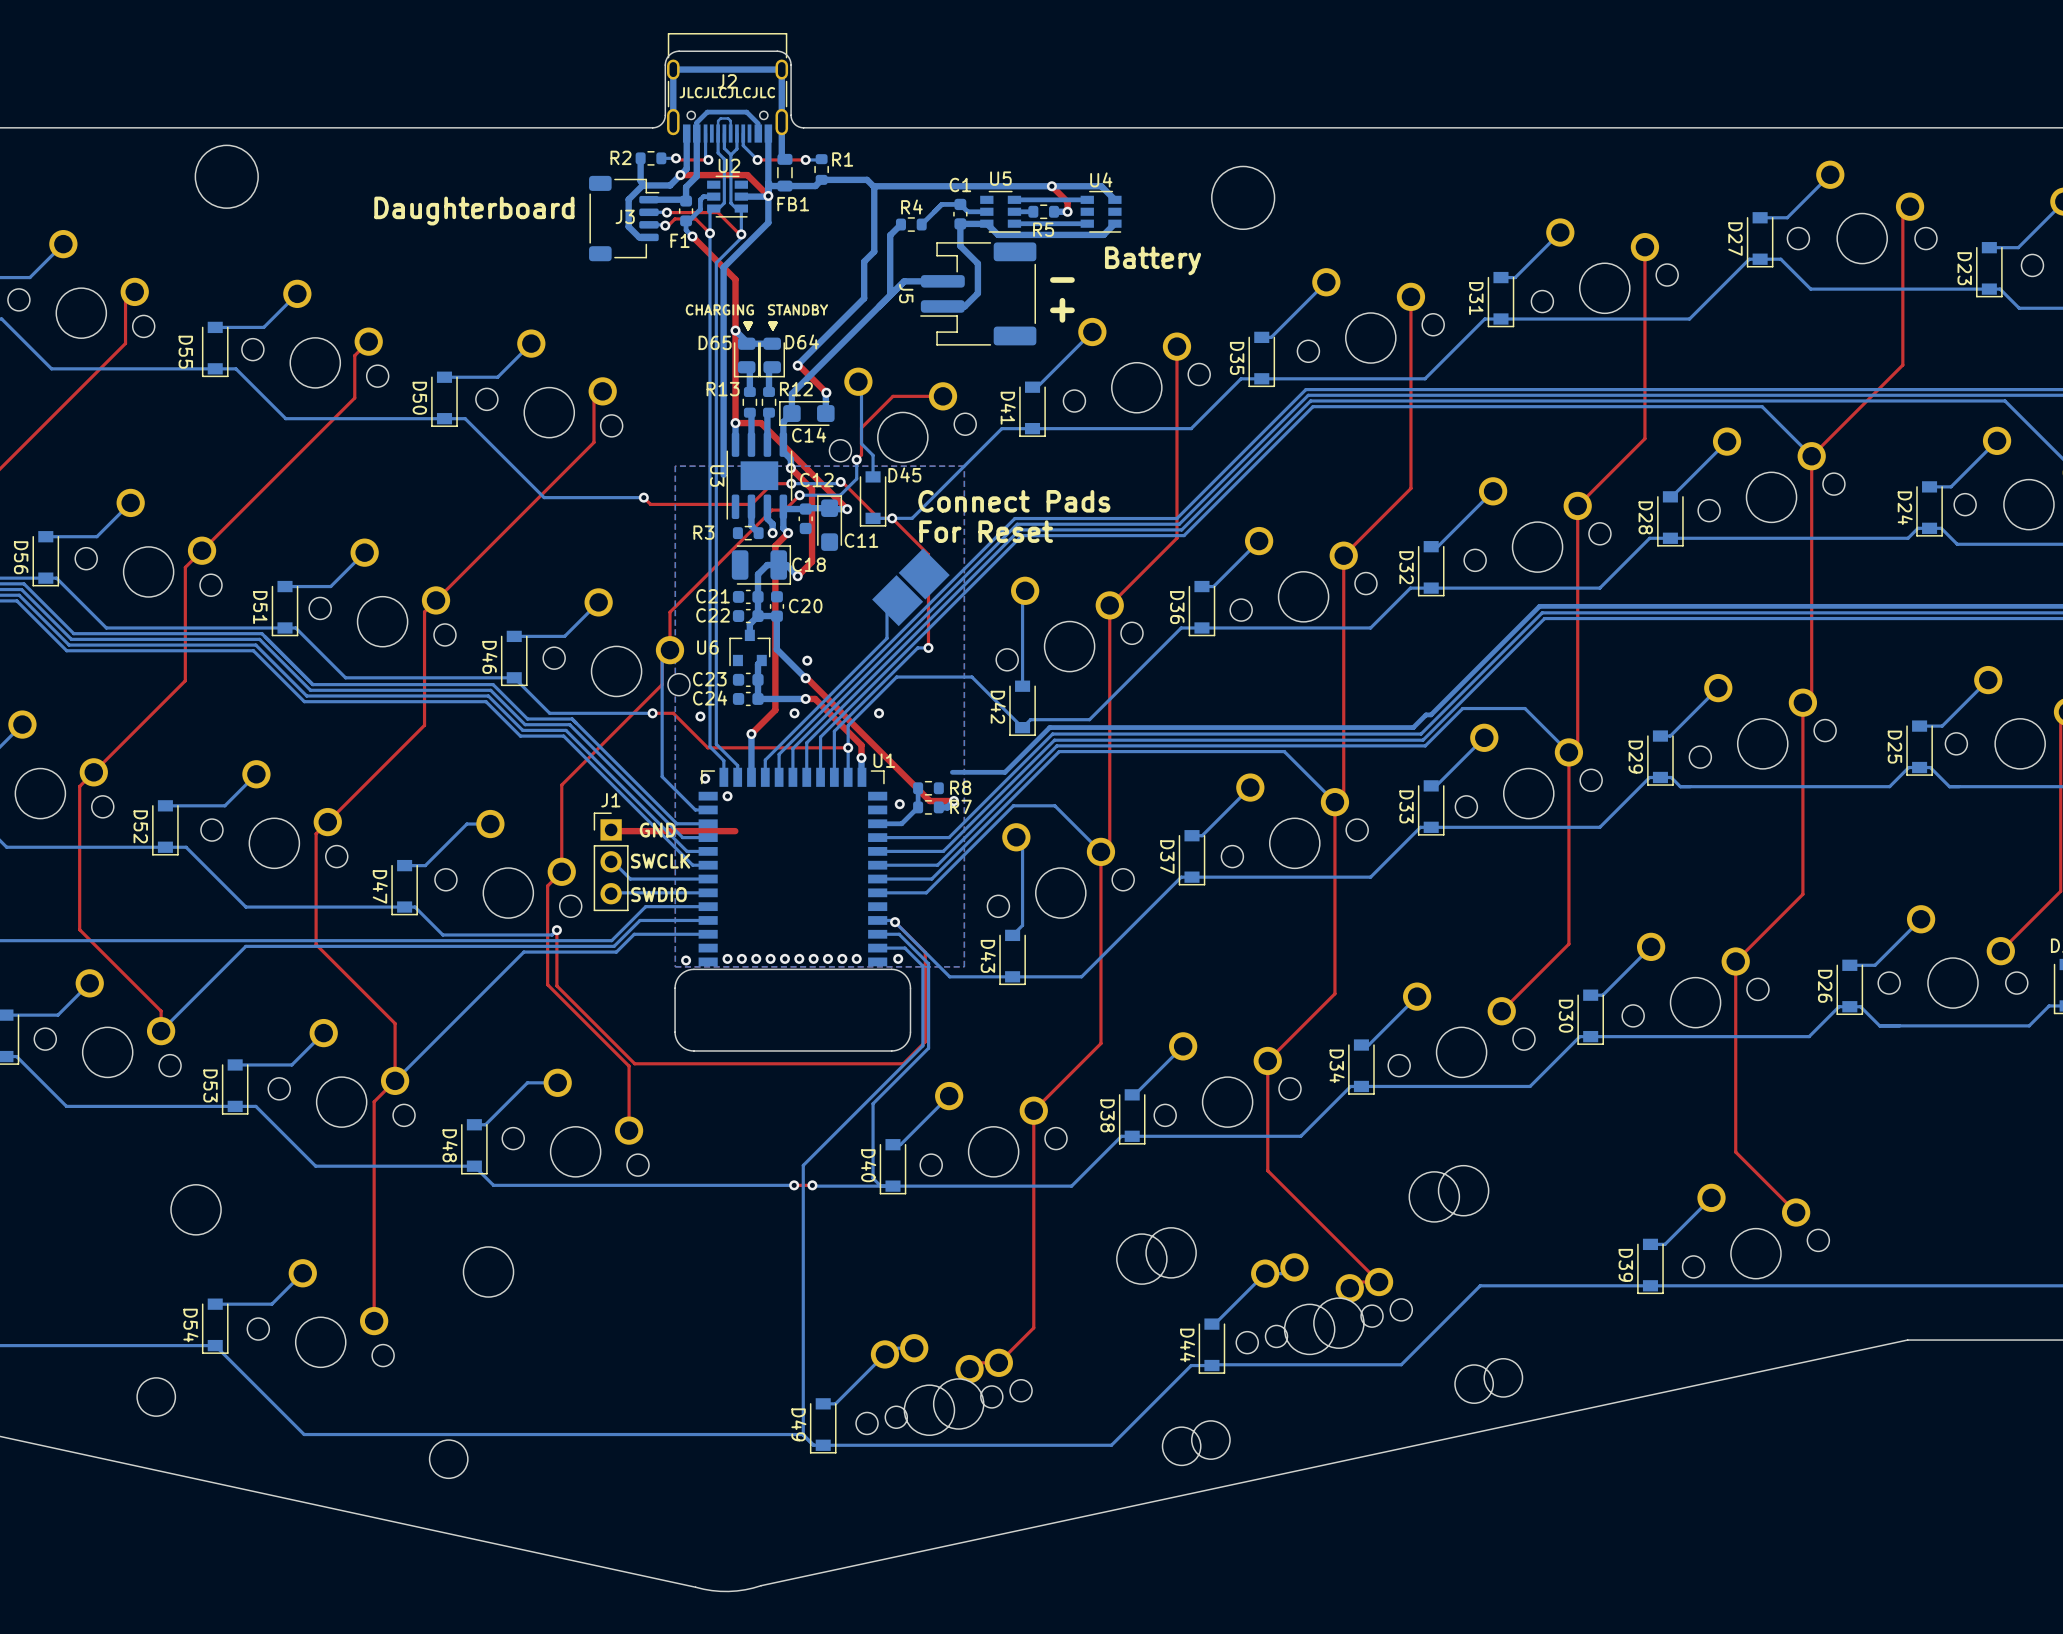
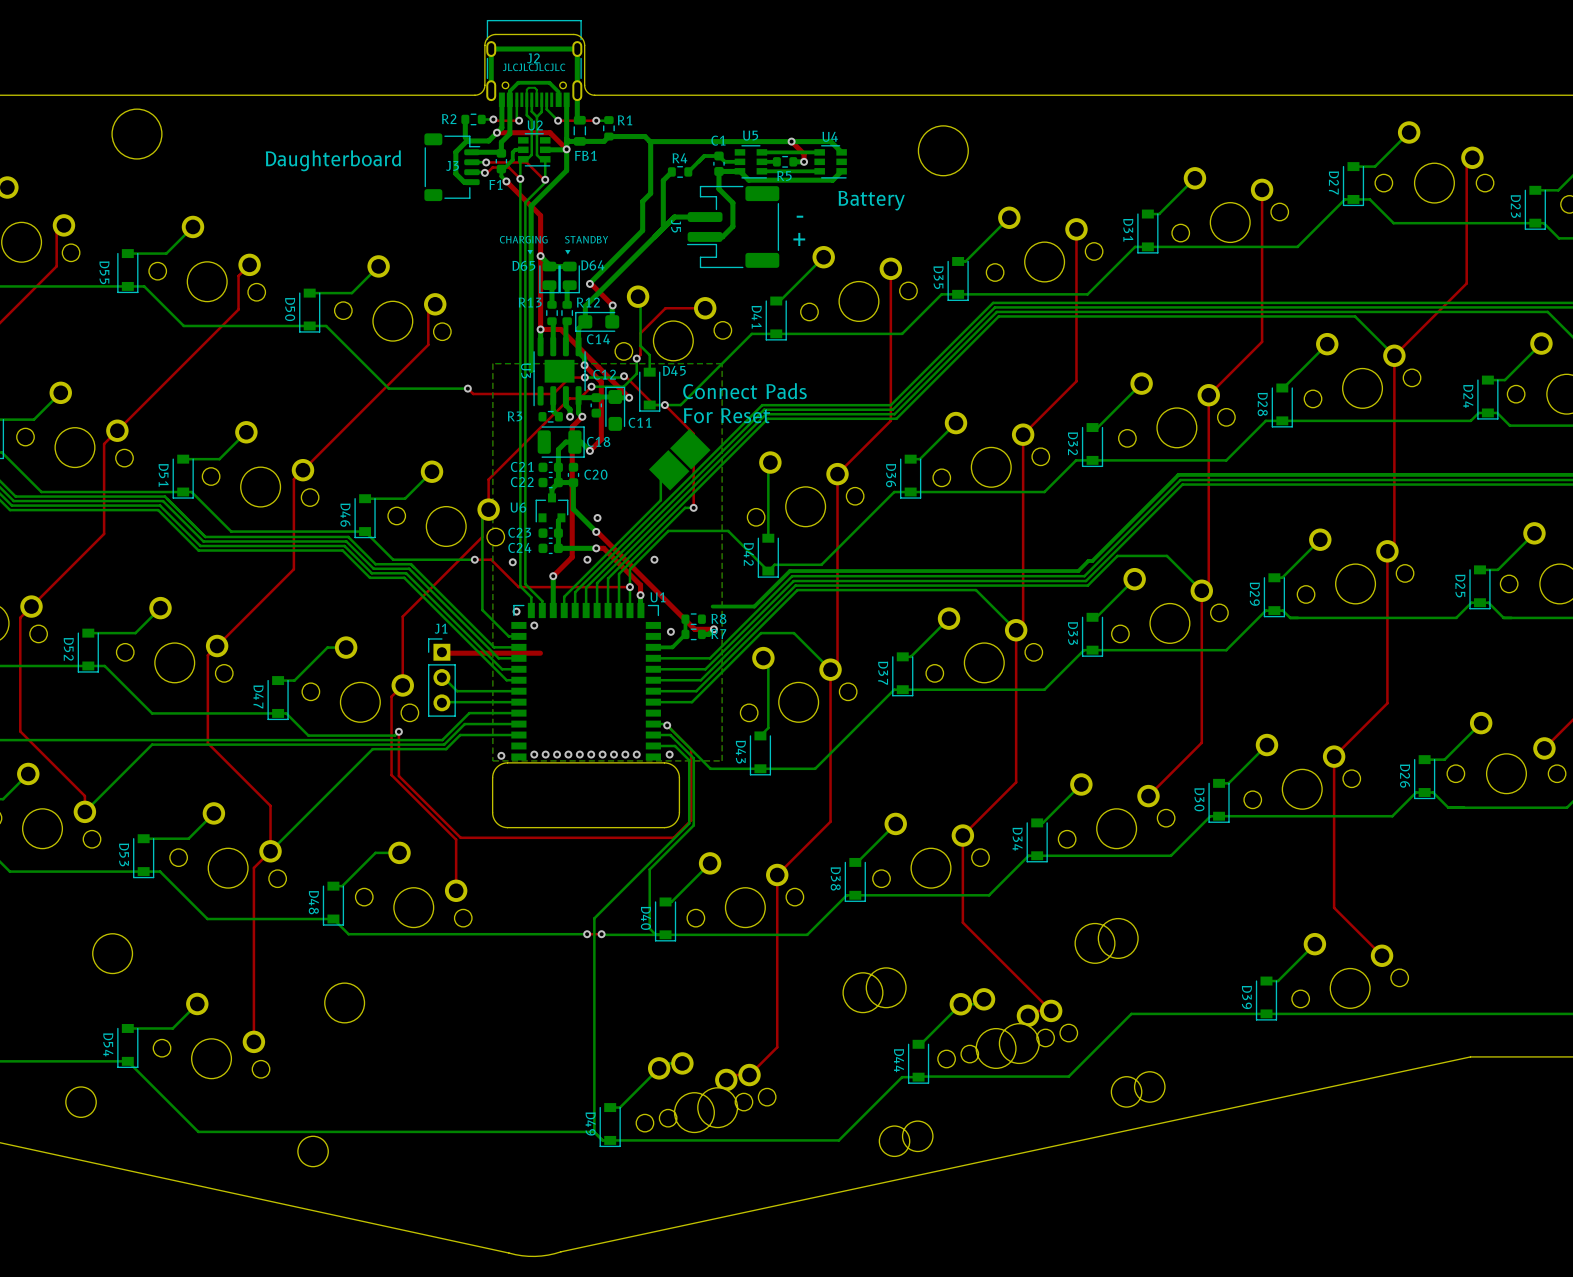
text: GND (657, 830) -> none
text: SWCLK (660, 861) -> none
text: SWDIO (658, 894) -> none

